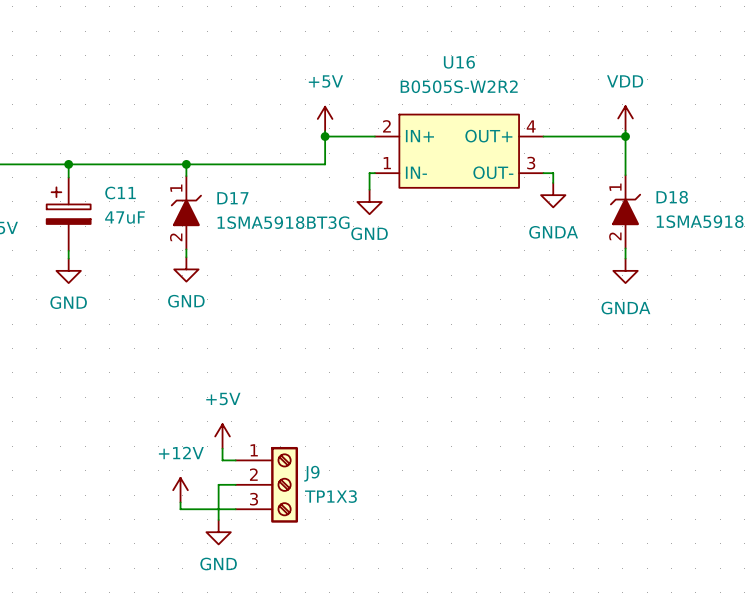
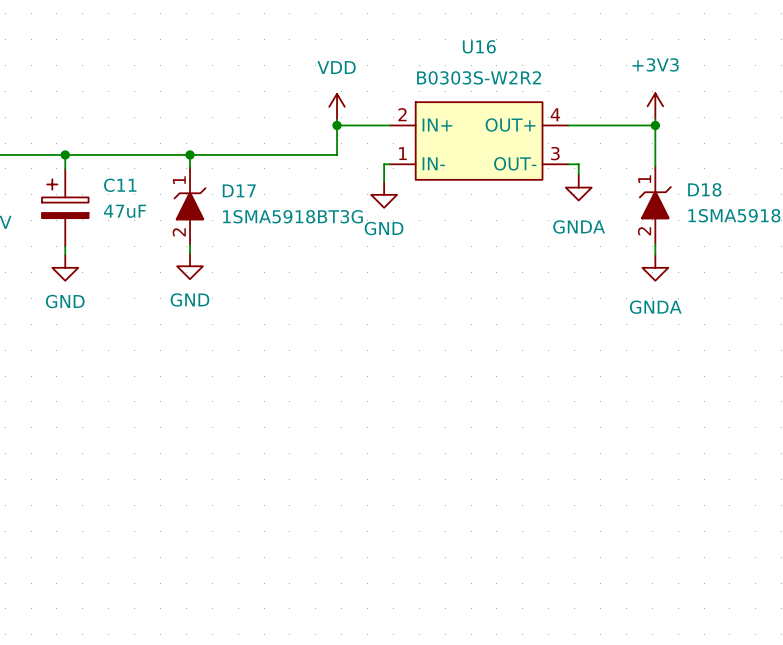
U16 value: B0505S-W2R2 (459, 86) -> B0303S-W2R2 (479, 77)
power symbol: +5V (325, 118) -> VDD (337, 106)
power symbol: VDD (625, 118) -> +3V3 (655, 106)
power symbol: +5V (222, 436) -> none
wire: (222, 448) (222, 460) (235, 460) -> none
wire: (235, 484) (218, 484) (218, 520) -> none
J9: TP1X3 (266, 484) -> none
power symbol: +12V (180, 490) -> none
wire: (180, 502) (180, 509) (235, 509) -> none
power symbol: GND (218, 532) -> none

